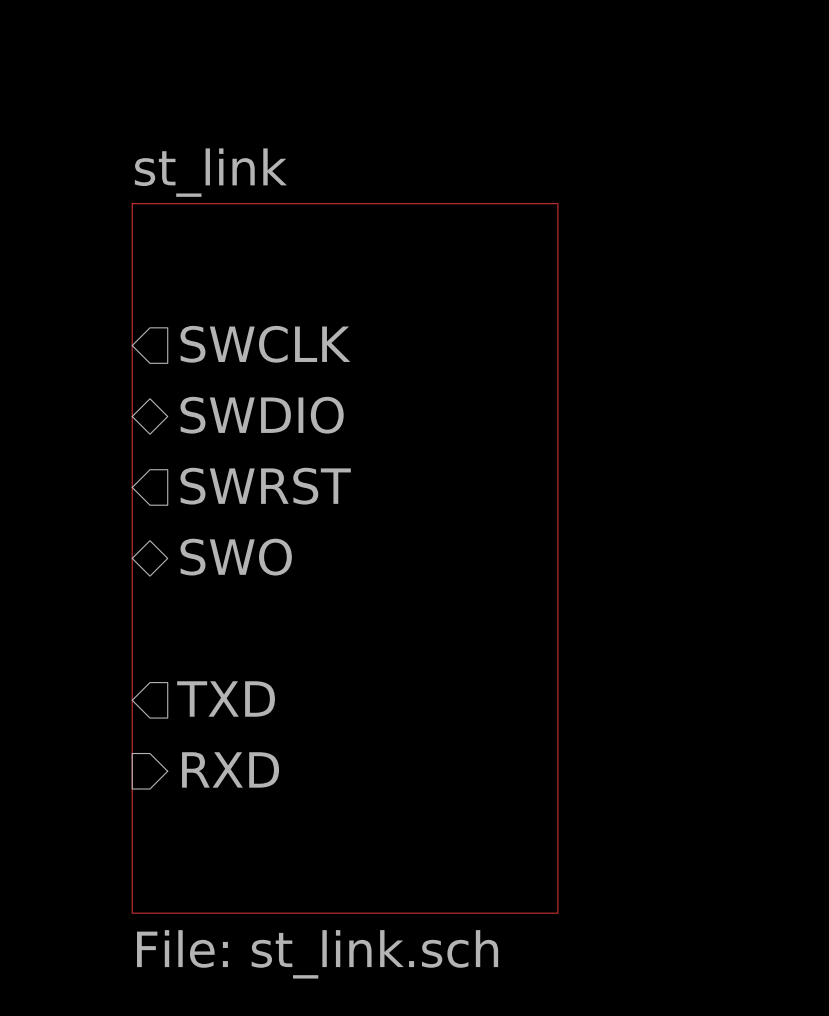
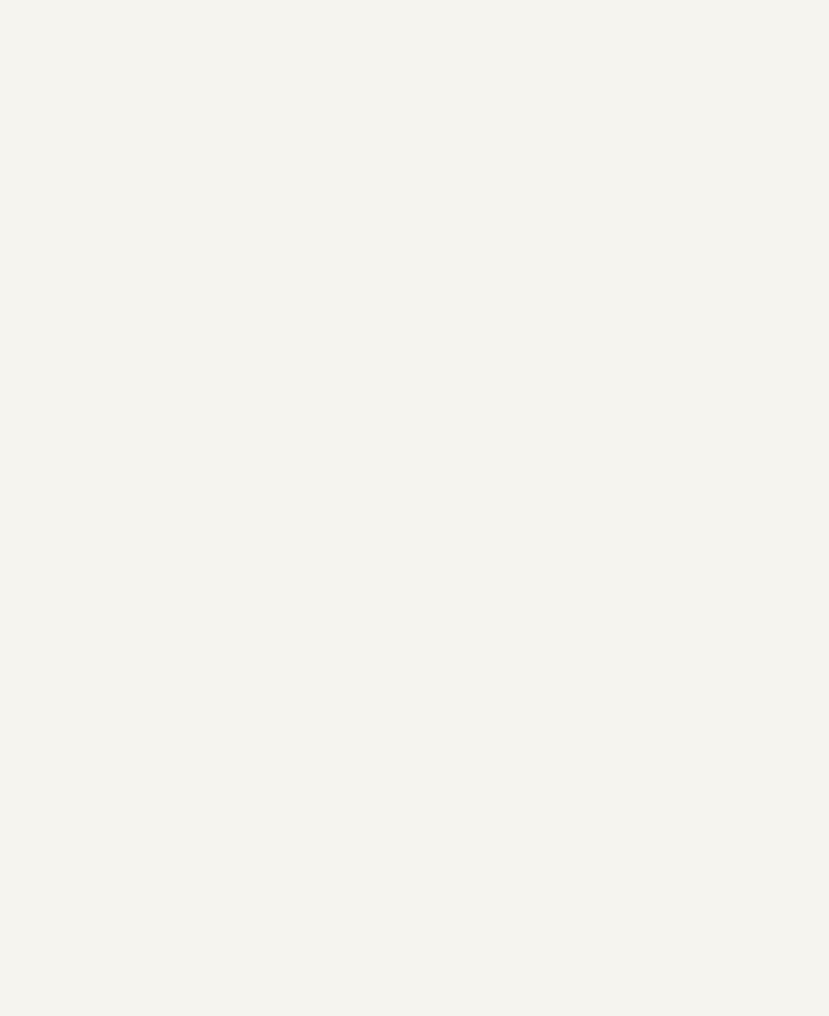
sheet pin: SWCLK (265, 344) -> none
sheet pin: SWDIO (262, 415) -> none
sheet pin: SWRST (265, 486) -> none
sheet pin: SWO (236, 557) -> none
sheet st_link: File: st_link.sch (345, 558) -> none
sheet pin: TXD (226, 698) -> none
sheet pin: RXD (230, 769) -> none

